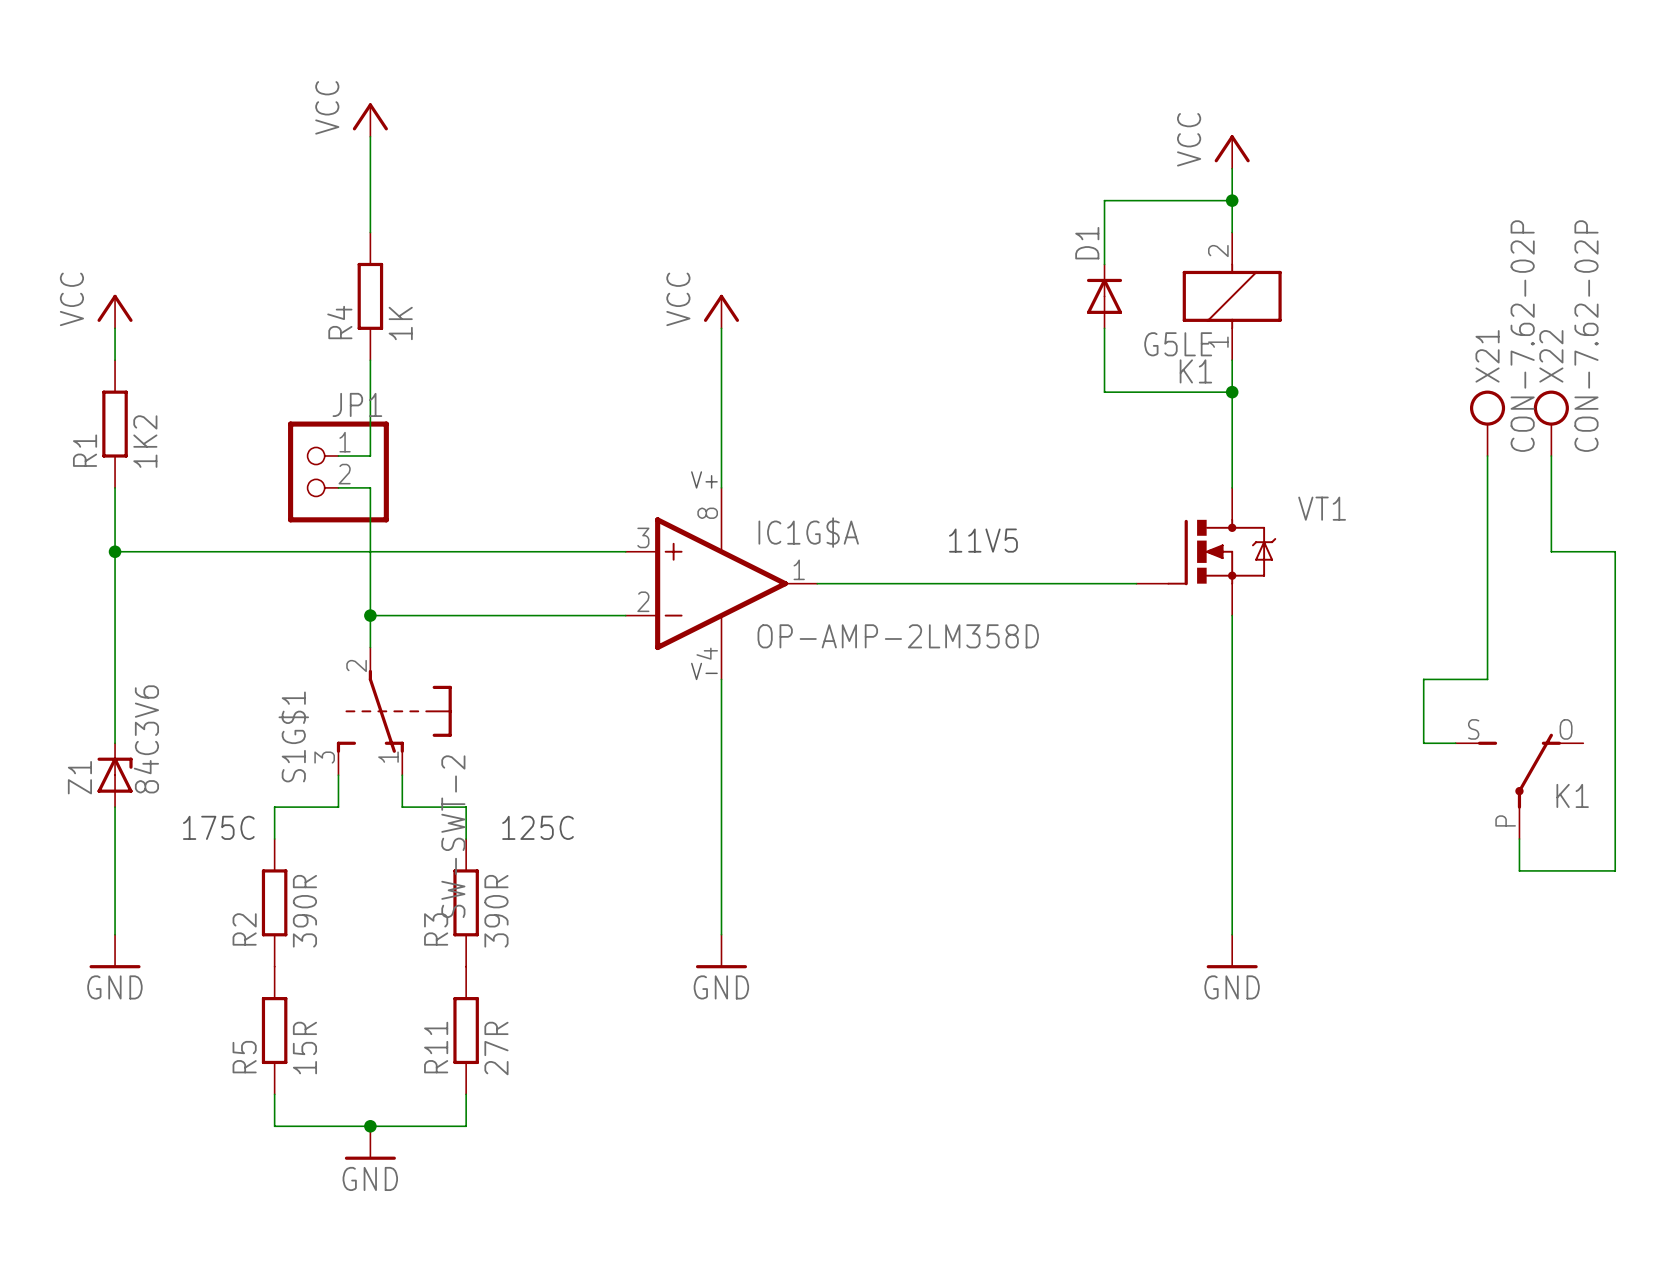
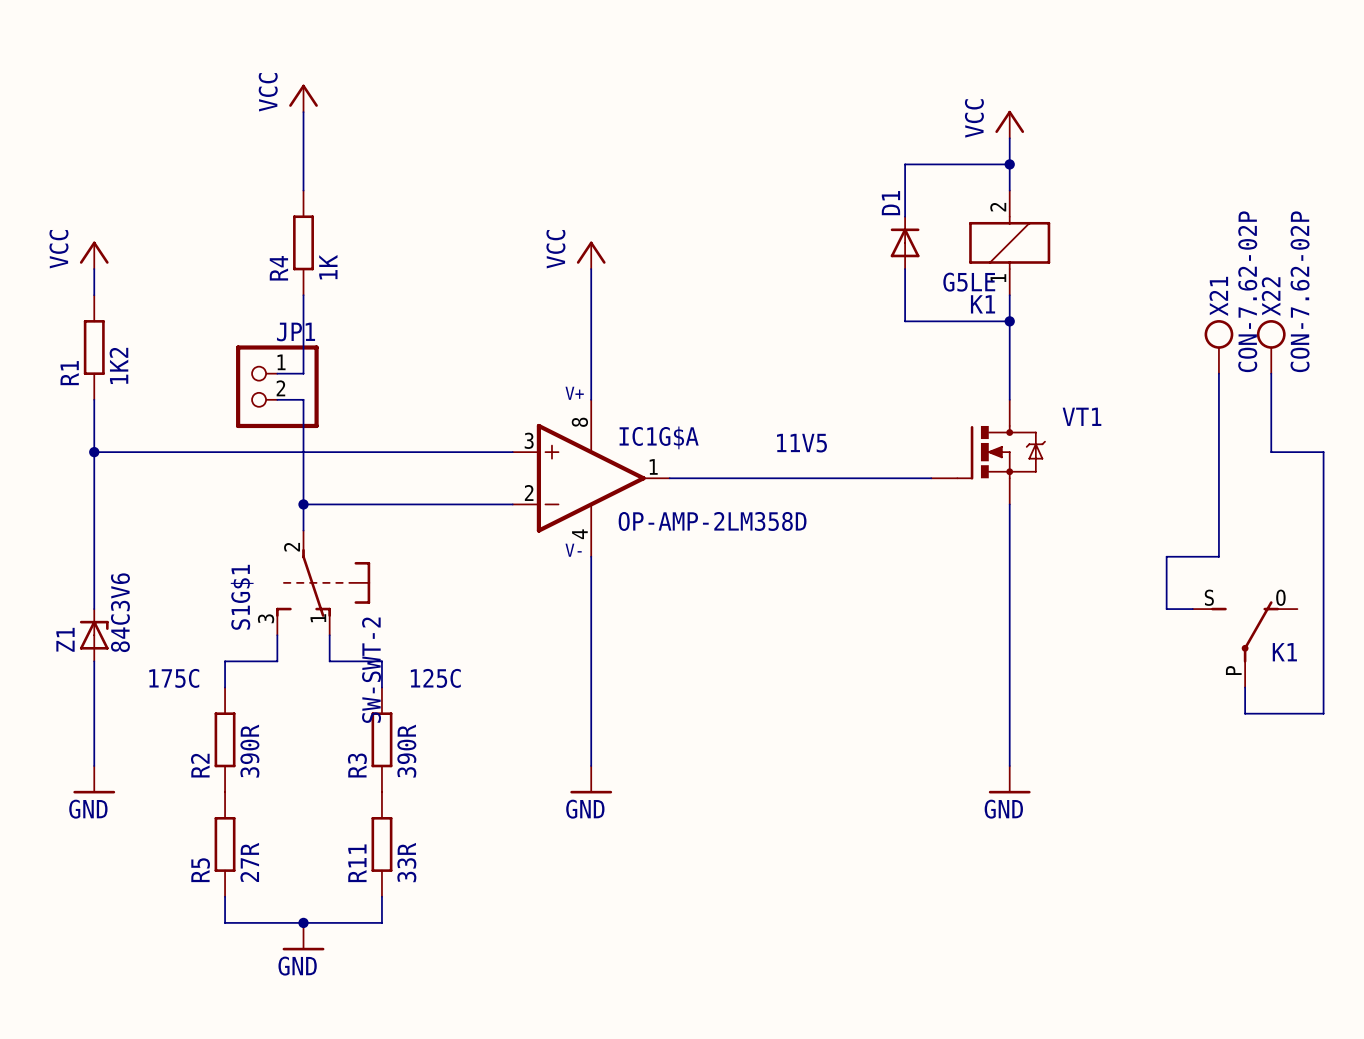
R5 value: 15R (304, 1048) -> 27R (249, 862)
R11 value: 27R (496, 1048) -> 33R (406, 862)

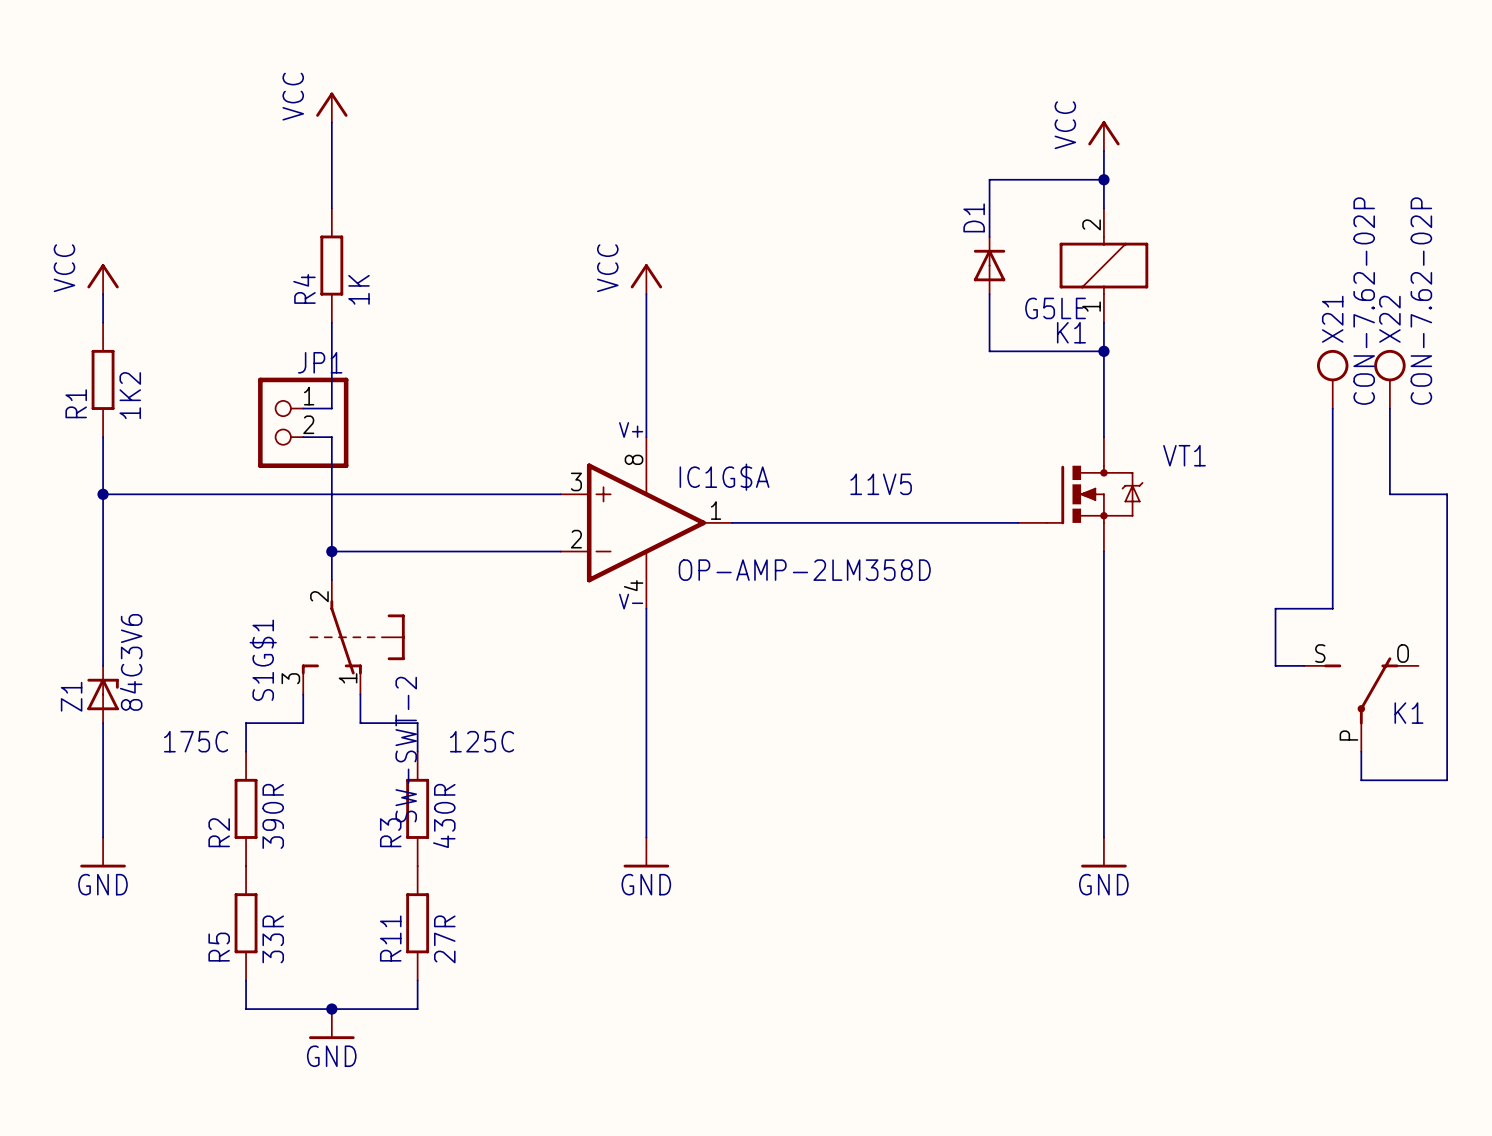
R3 value: 390R (406, 751) -> 430R (444, 815)
R5 value: 27R (249, 862) -> 33R (273, 939)
R11 value: 33R (406, 862) -> 27R (444, 939)

